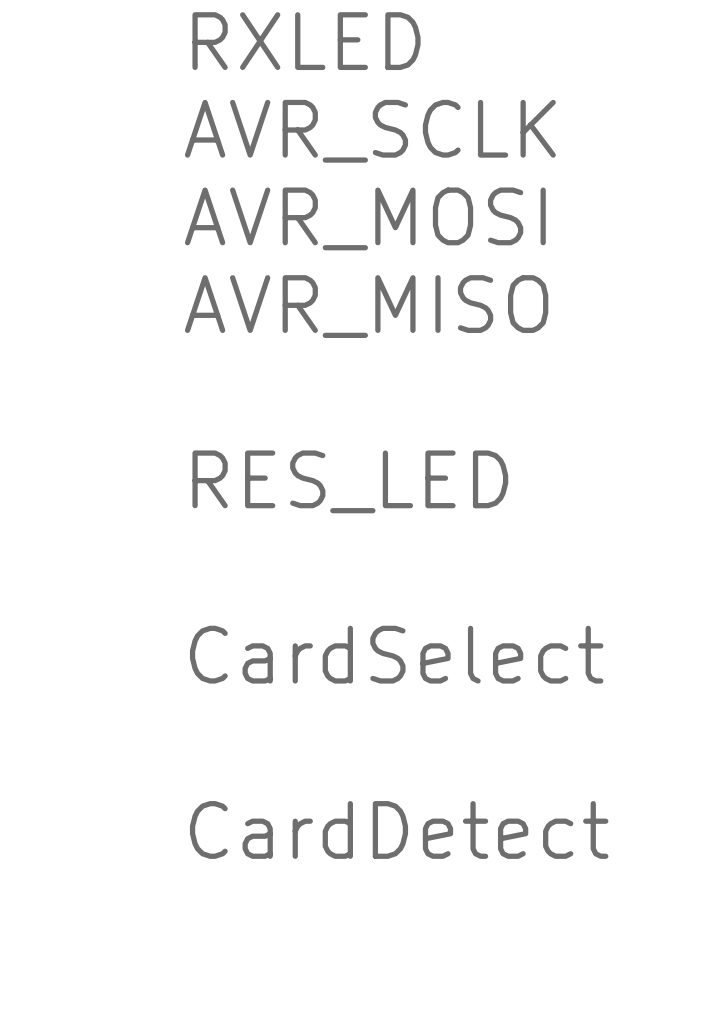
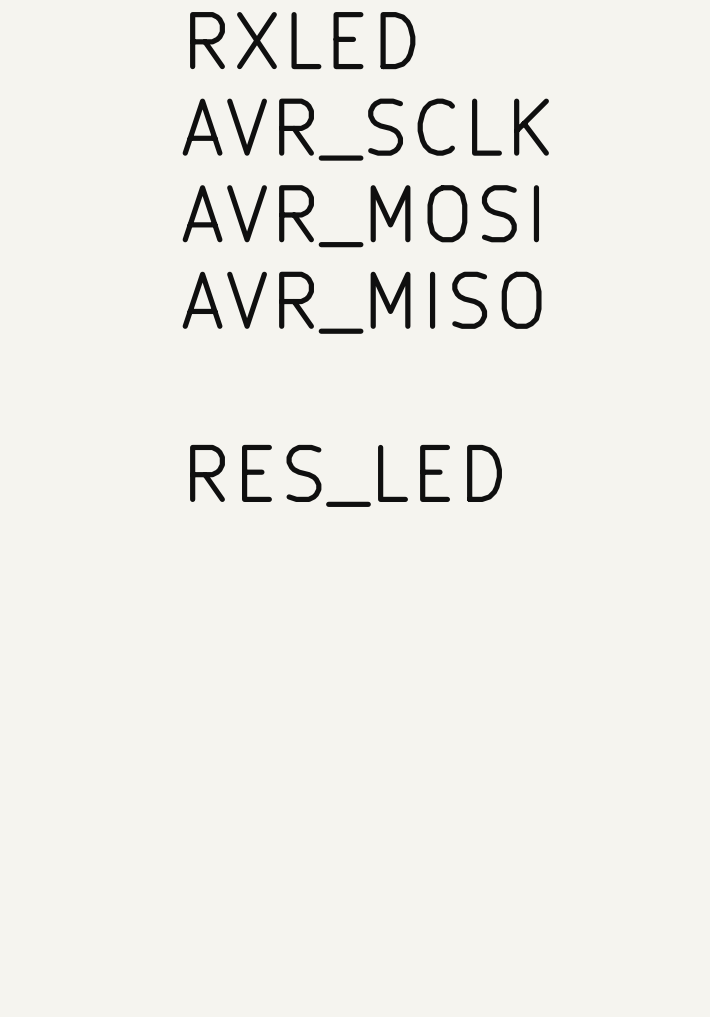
label: CardSelect (396, 654) -> none
label: CardDetect (399, 829) -> none

